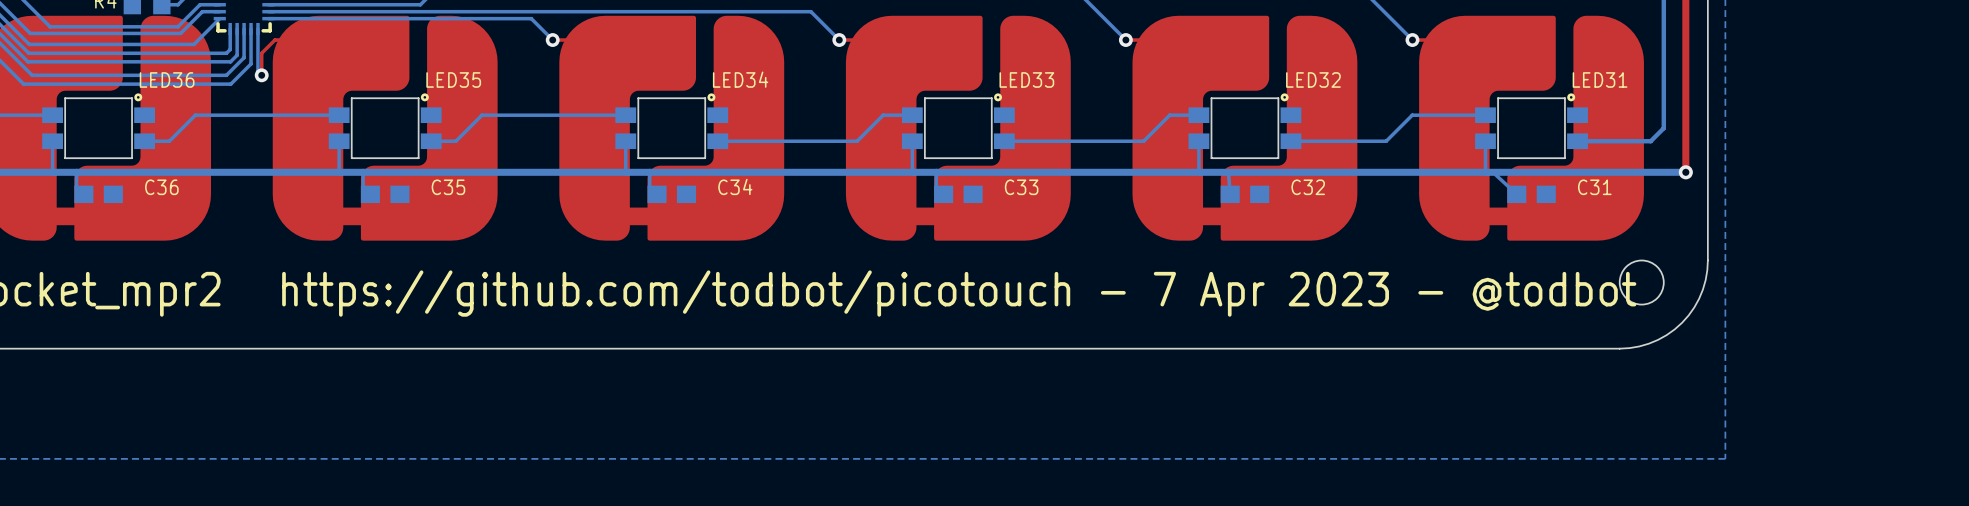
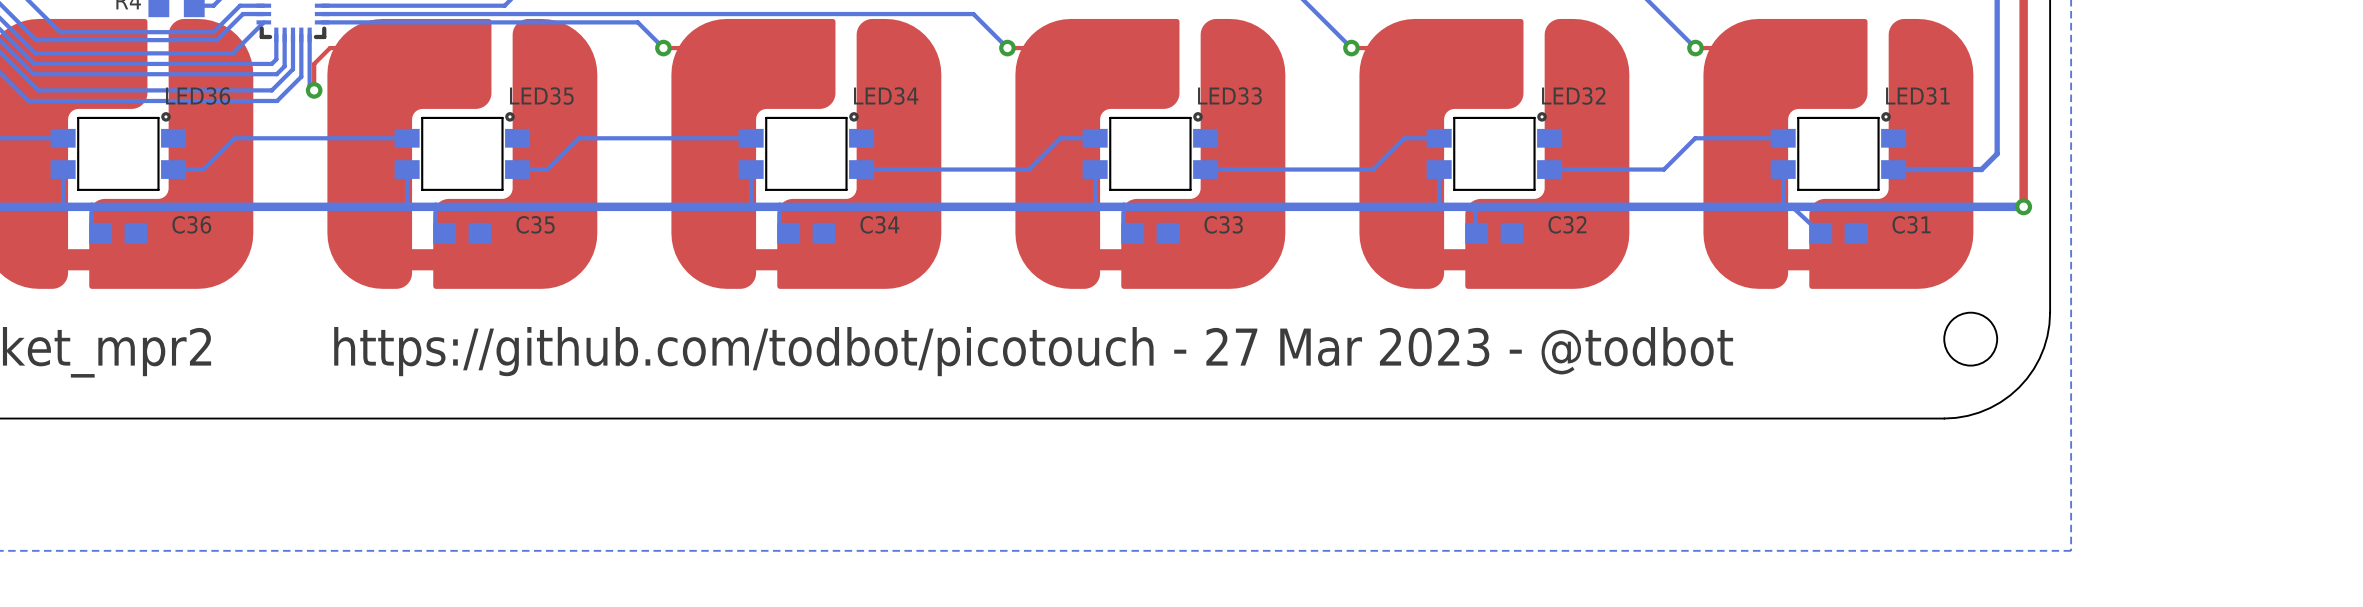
text: https://github.com/todbot/picotouch - 7 Apr 2023 - @todbot (959, 293) -> https://github.com/todbot/picotouch - 27 Mar 2023 - @todbot (1033, 351)

